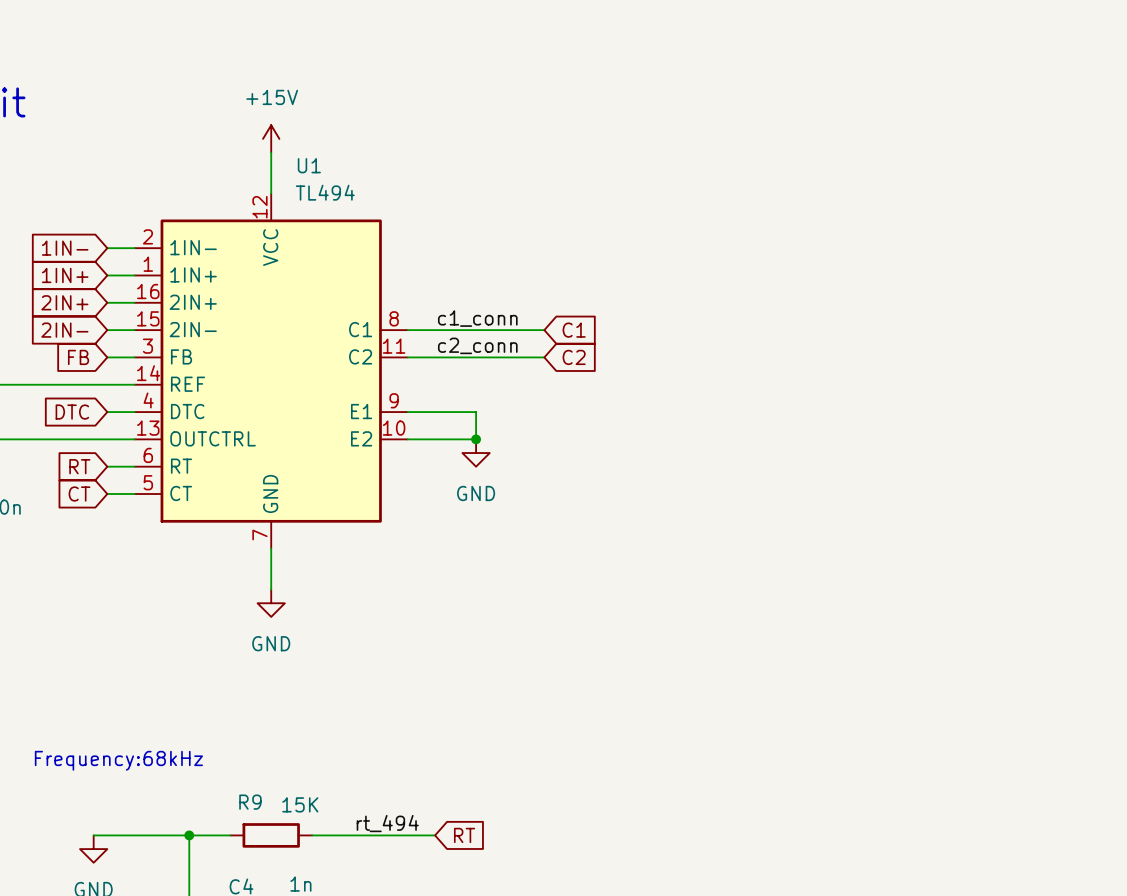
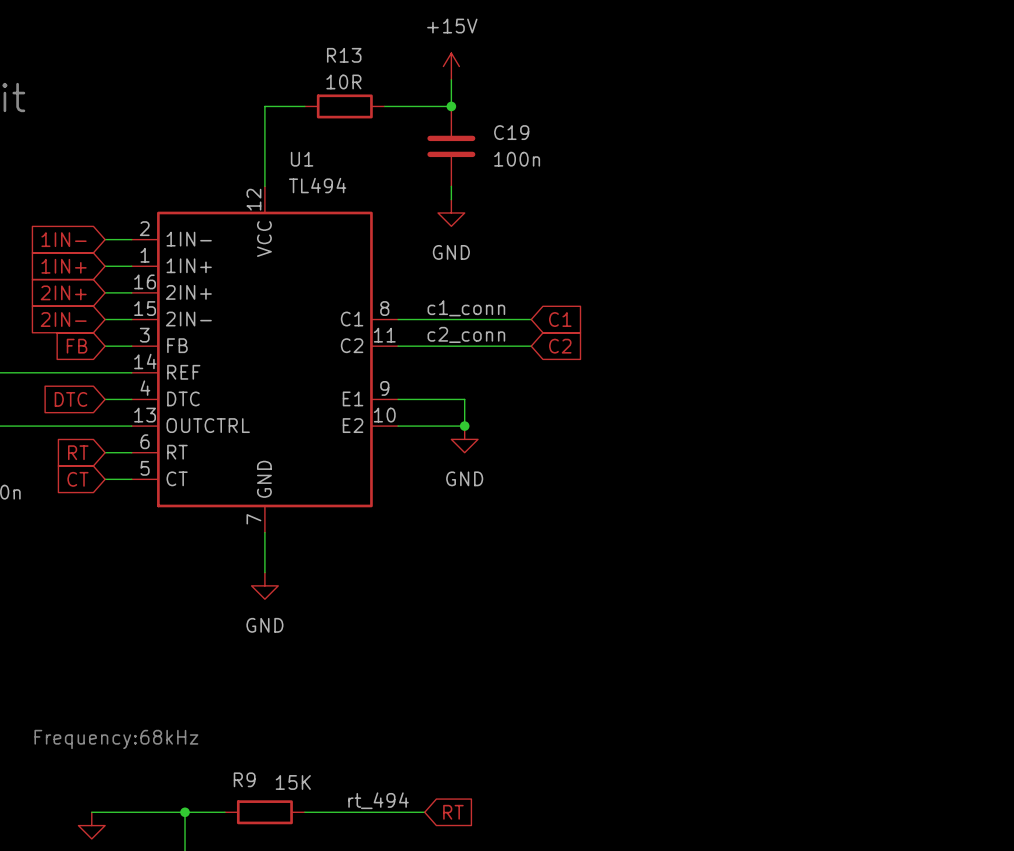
wire: none -> (451, 79) (451, 106) (384, 106)
wire: none -> (304, 106) (264, 106) (264, 146)
R13: none -> 10R (344, 106)
junction: none -> (451, 106)
power symbol position: +15V (271, 138) -> +15V (451, 66)
C19: none -> 100n (451, 146)
wire: none -> (451, 186) (451, 199)
power symbol: none -> GND (451, 212)

